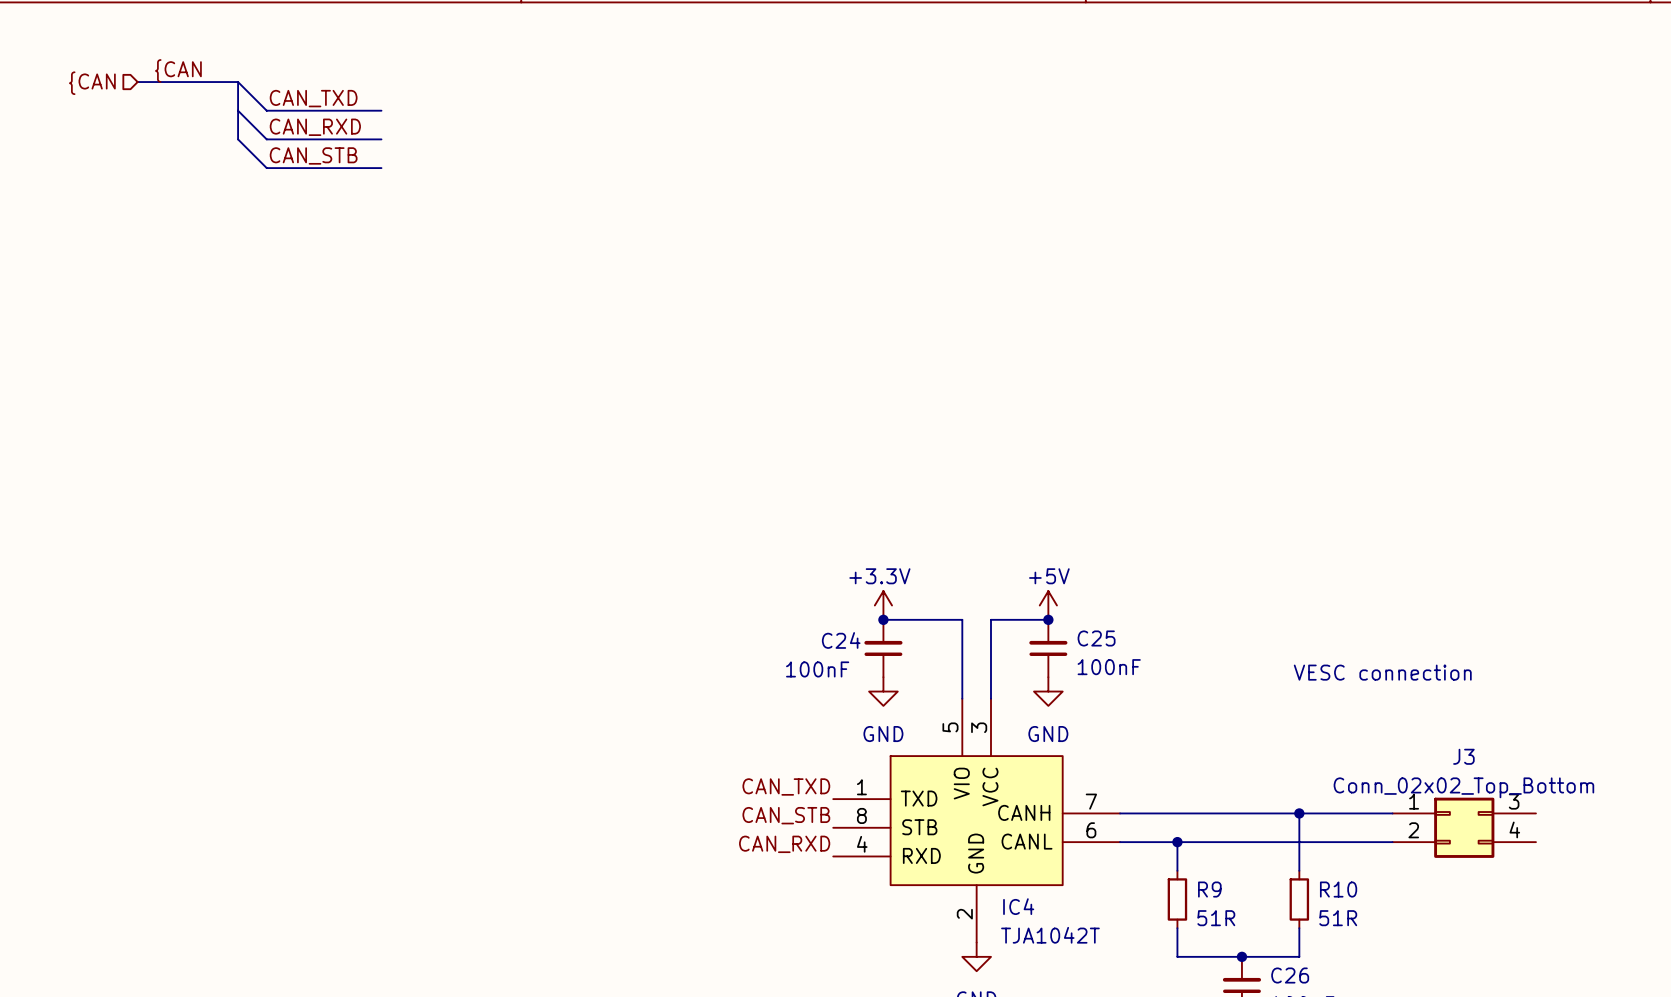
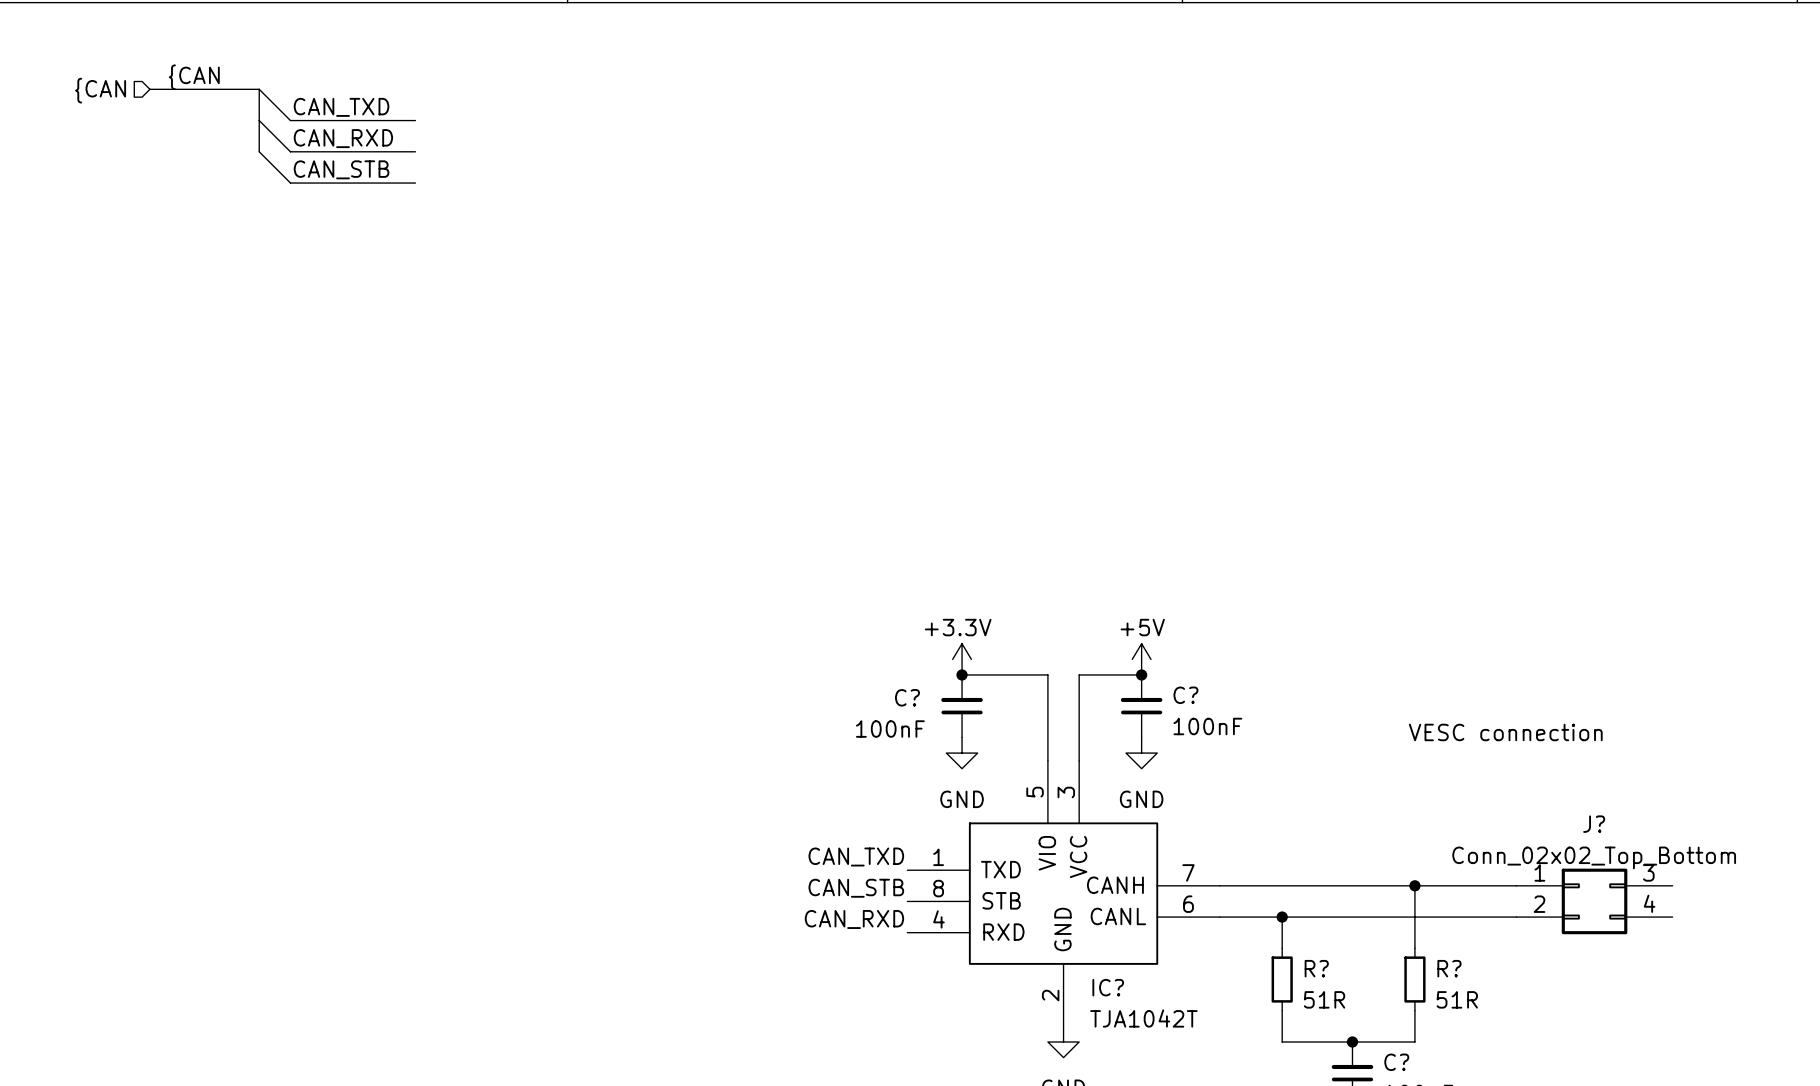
C25 name: C25 (1096, 638) -> C? (1185, 695)
C24 name: C24 (841, 640) -> C? (907, 697)
J3 name: J3 (1463, 756) -> J? (1594, 824)
R9 name: R9 (1209, 889) -> R? (1316, 968)
R10 name: R10 (1338, 889) -> R? (1449, 968)
IC4 name: IC4 (1018, 906) -> IC? (1108, 987)
C26 name: C26 (1290, 975) -> C? (1396, 1062)

